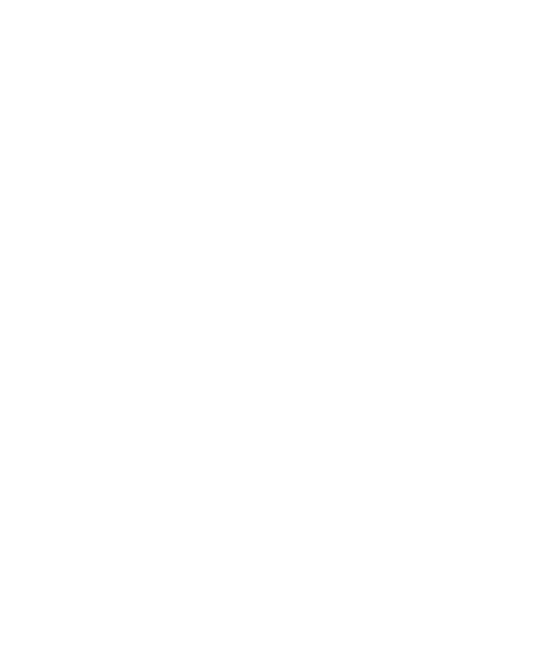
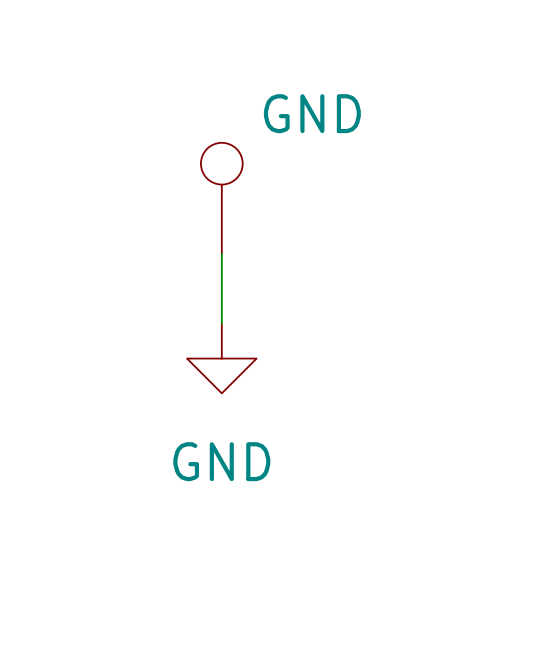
part: none -> GND (221, 198)
wire: none -> (221, 254) (221, 323)
power symbol: none -> GND (221, 358)

